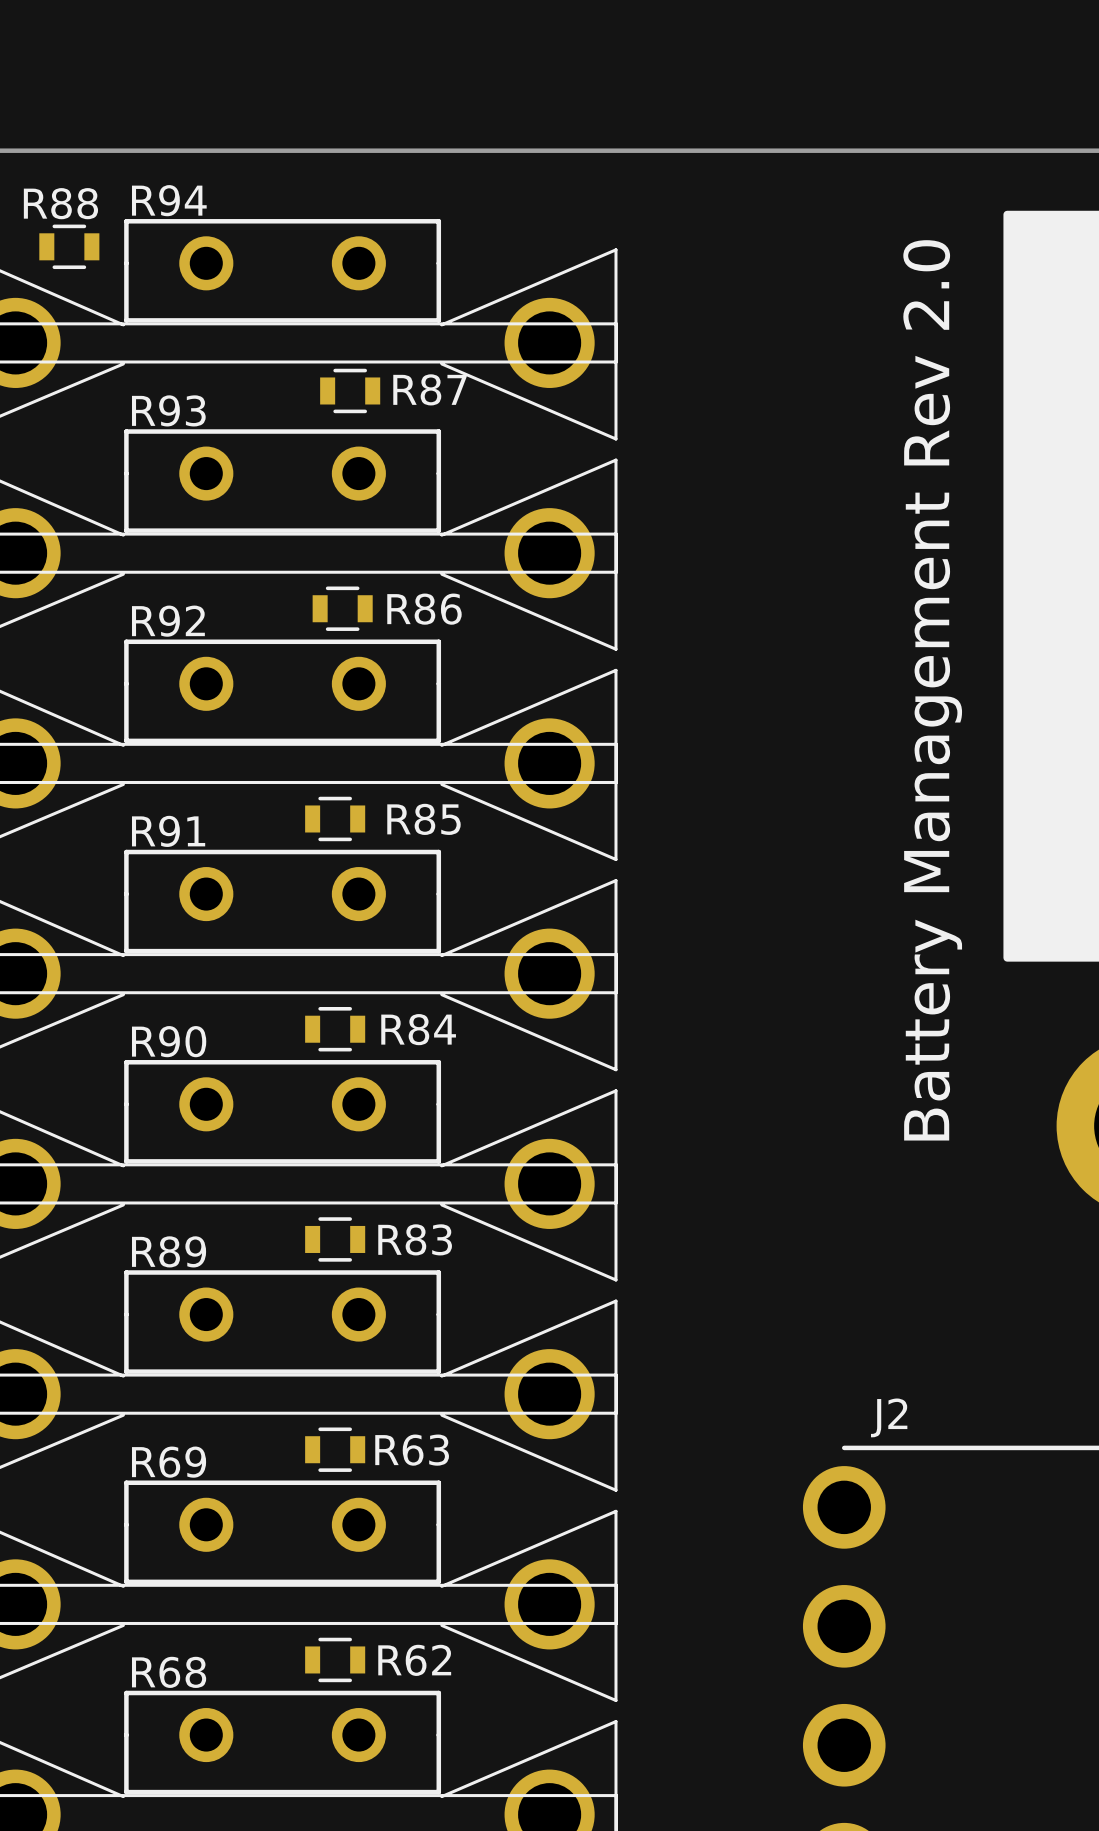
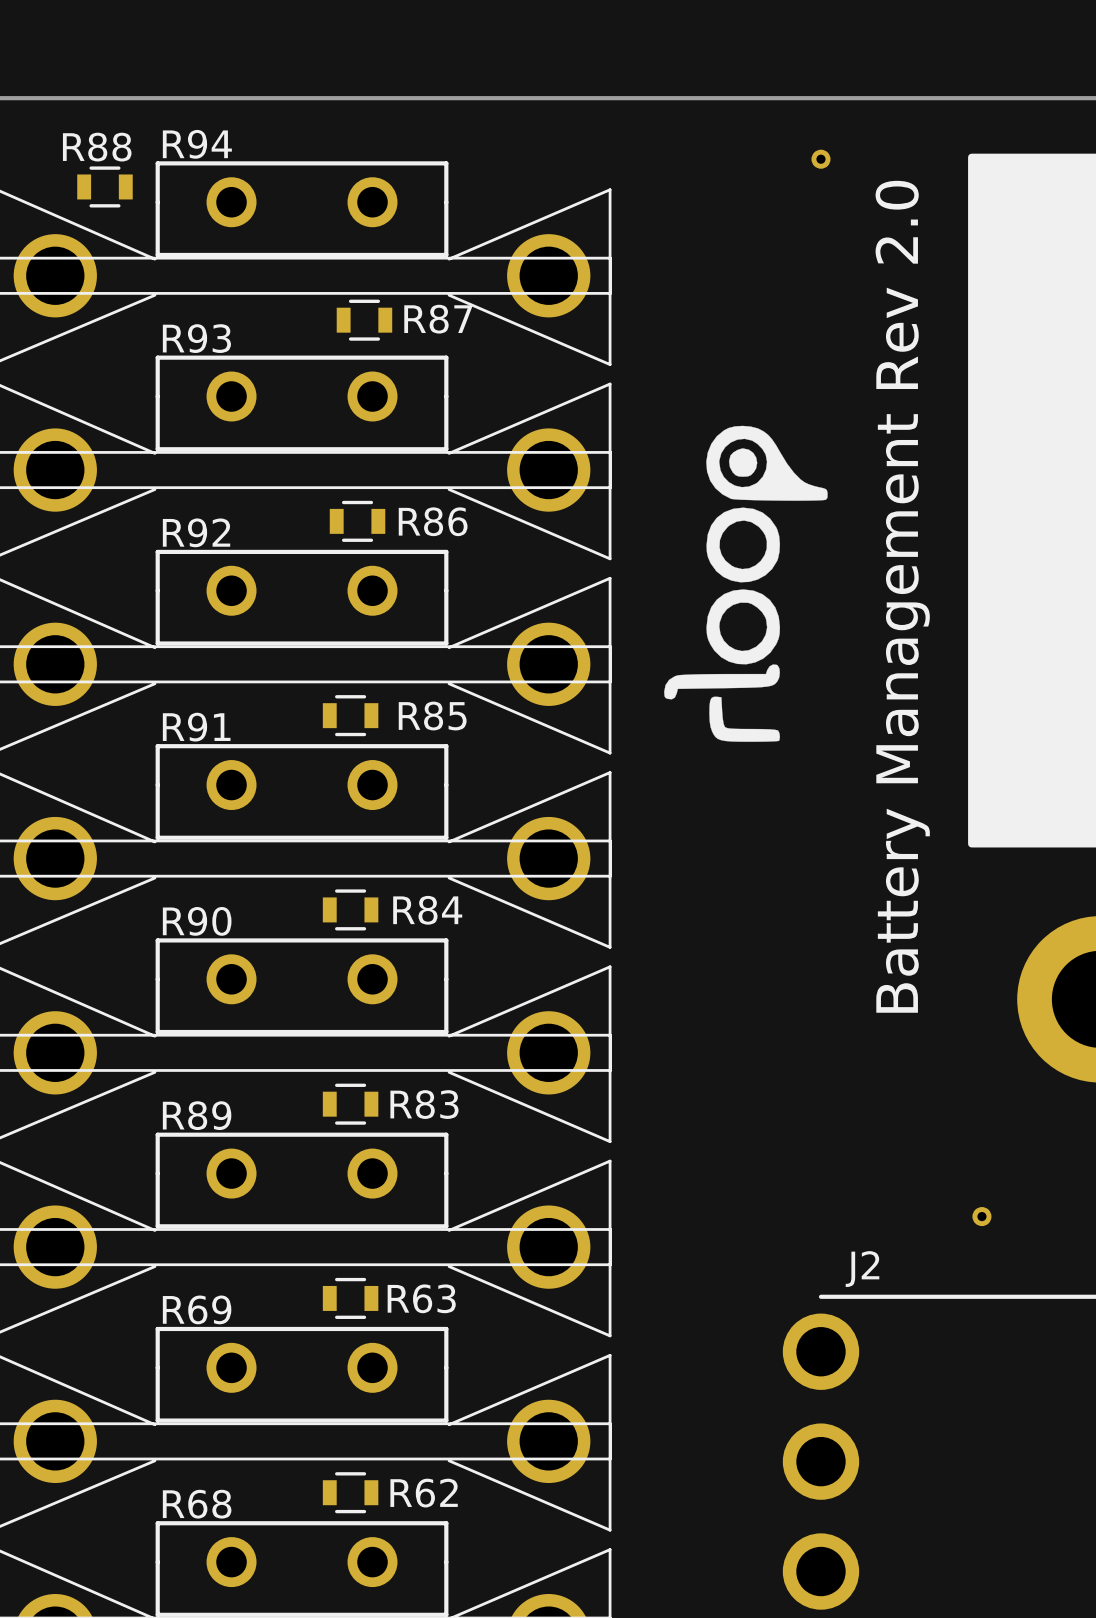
part: none -> (820, 159)
drawing: none -> [664, 425, 828, 742]
part: none -> (981, 1216)

